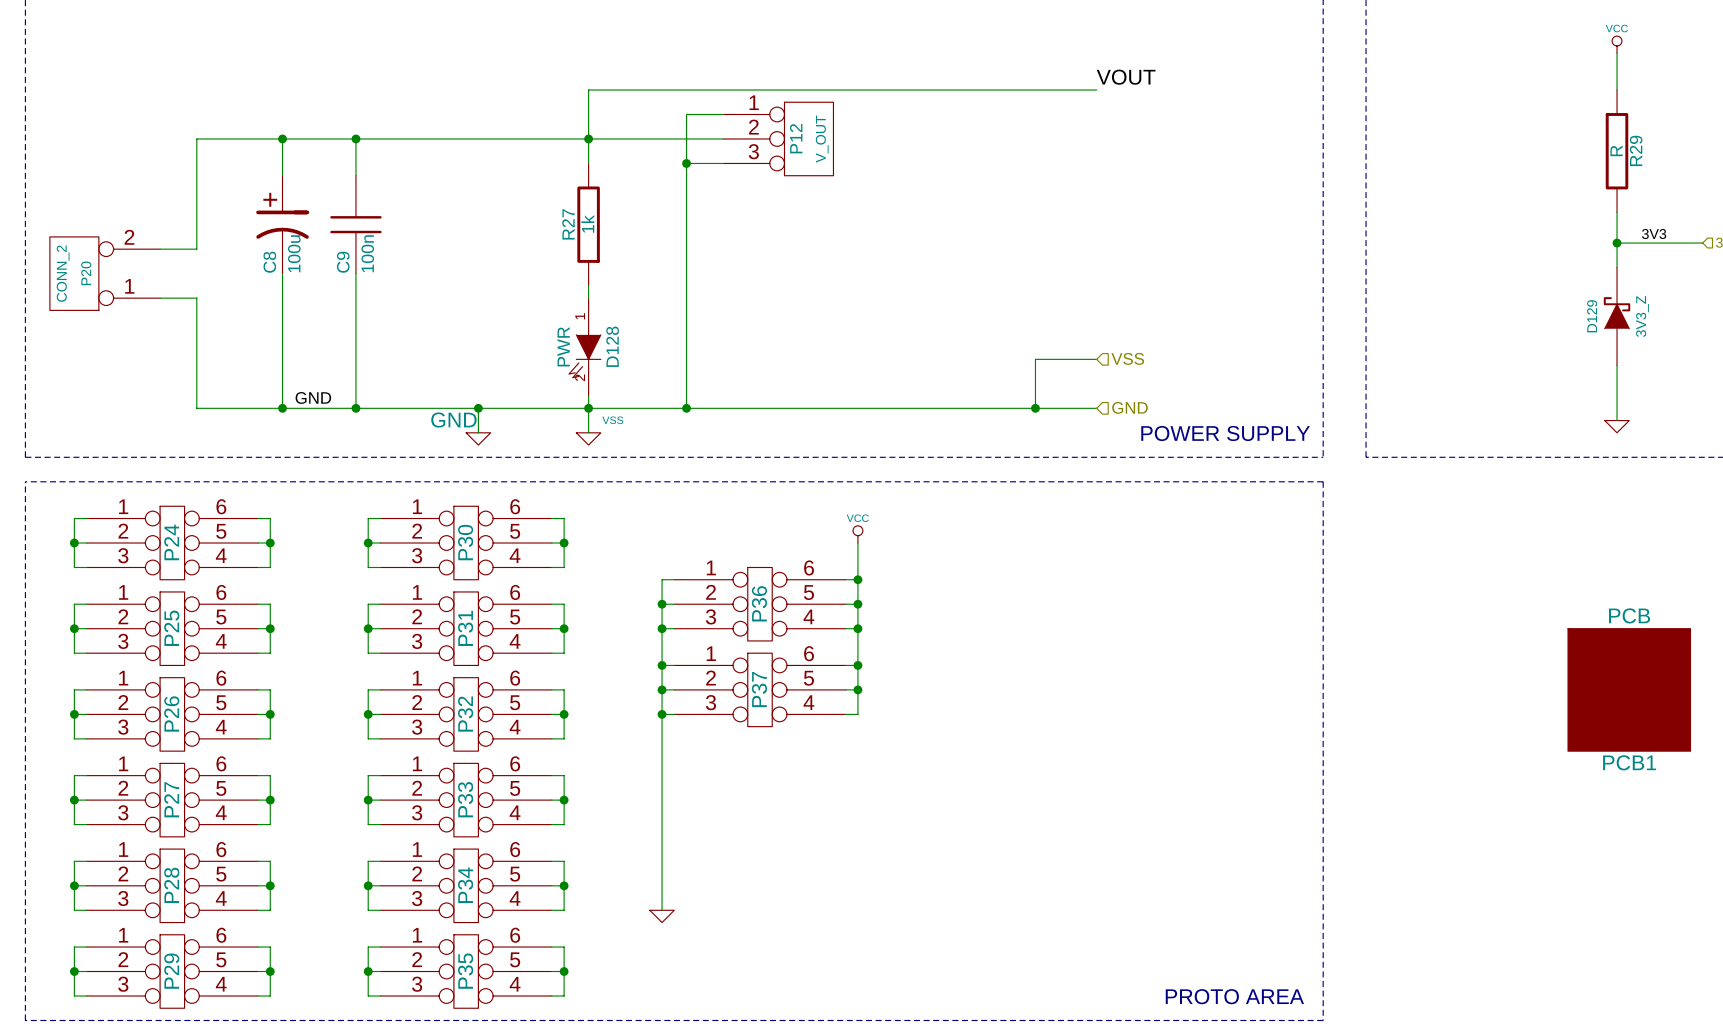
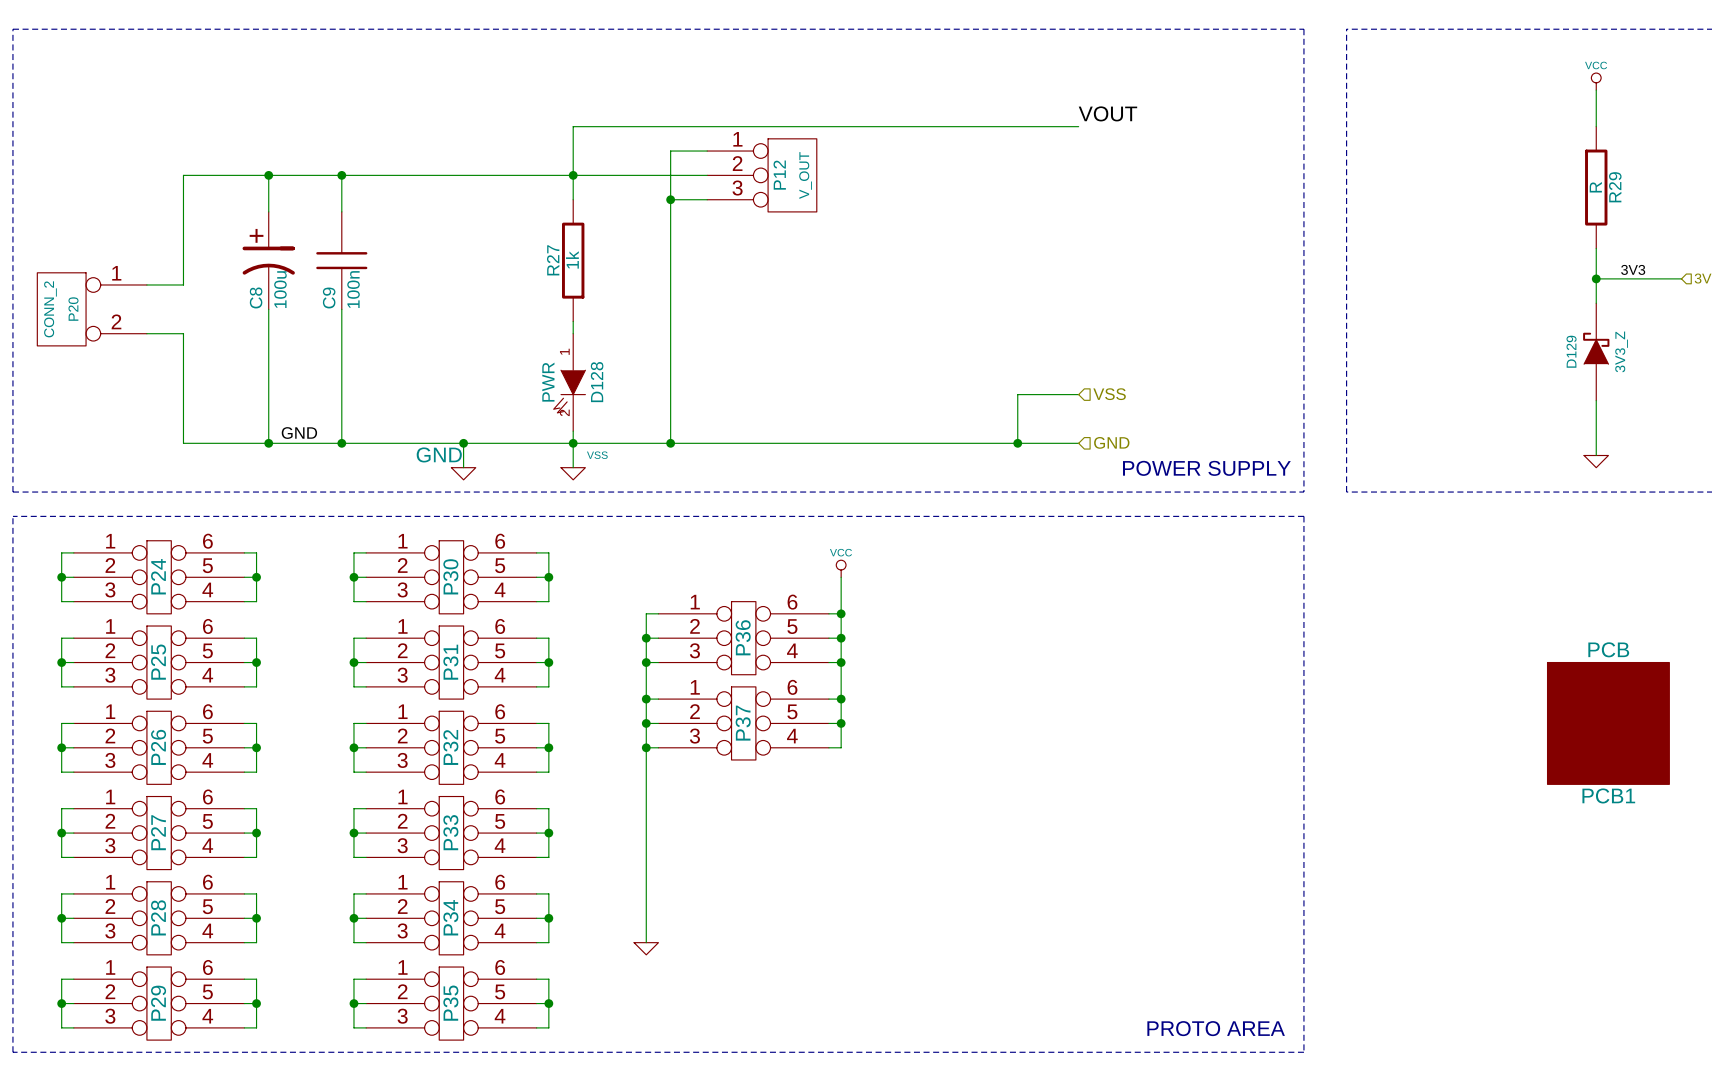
P20 flip: as is (74, 273) -> up-down (61, 309)

